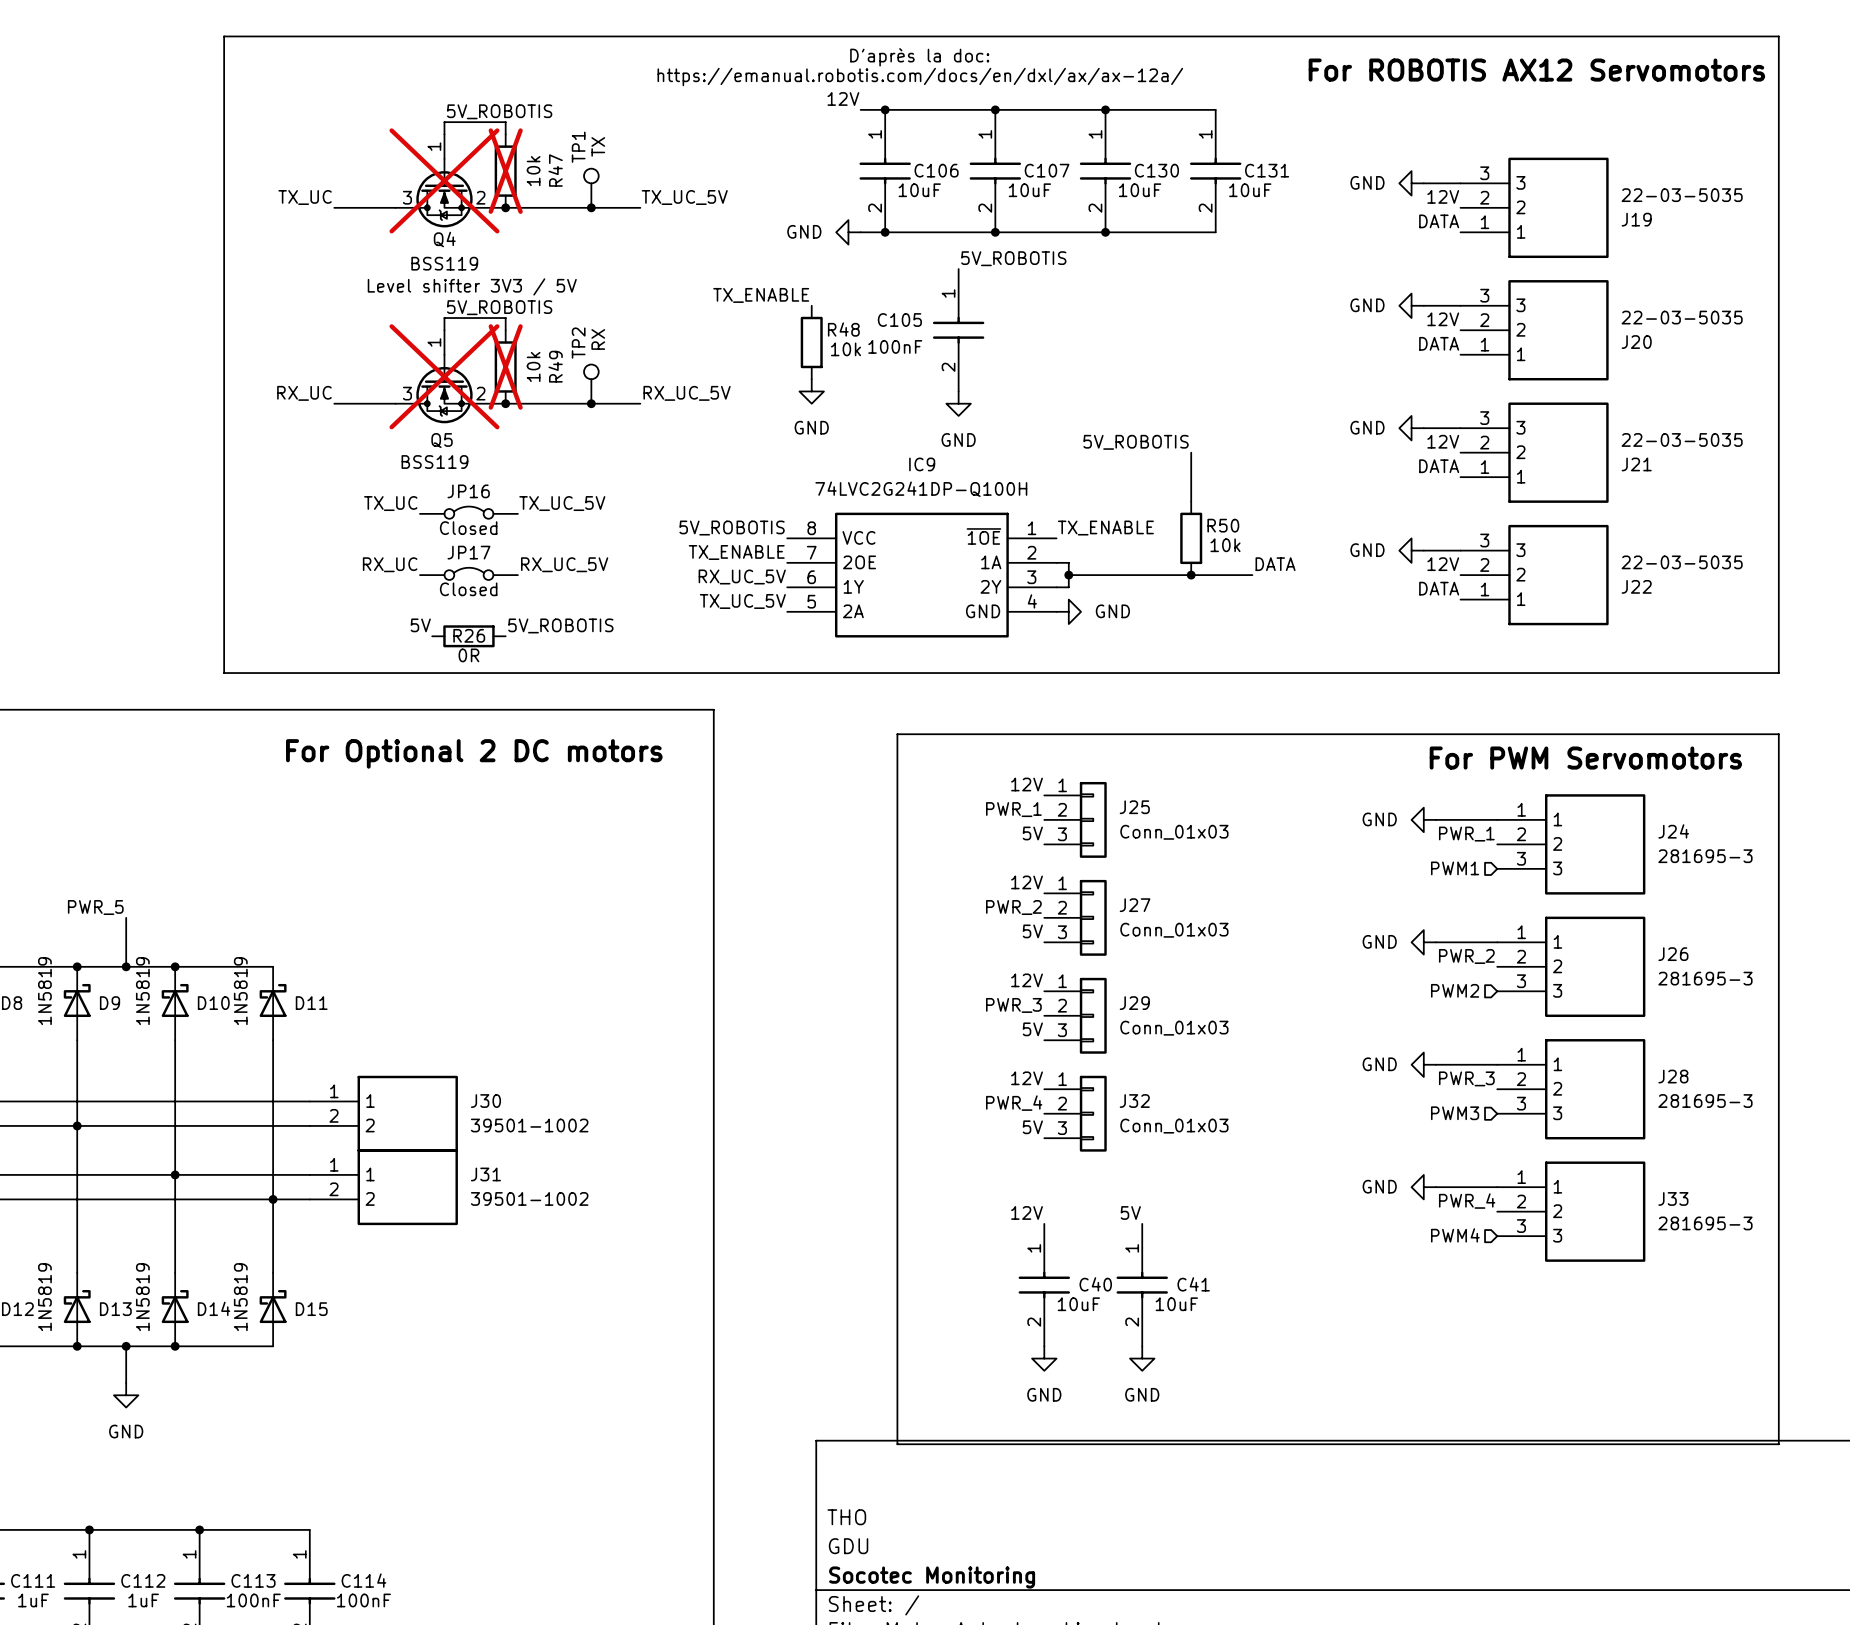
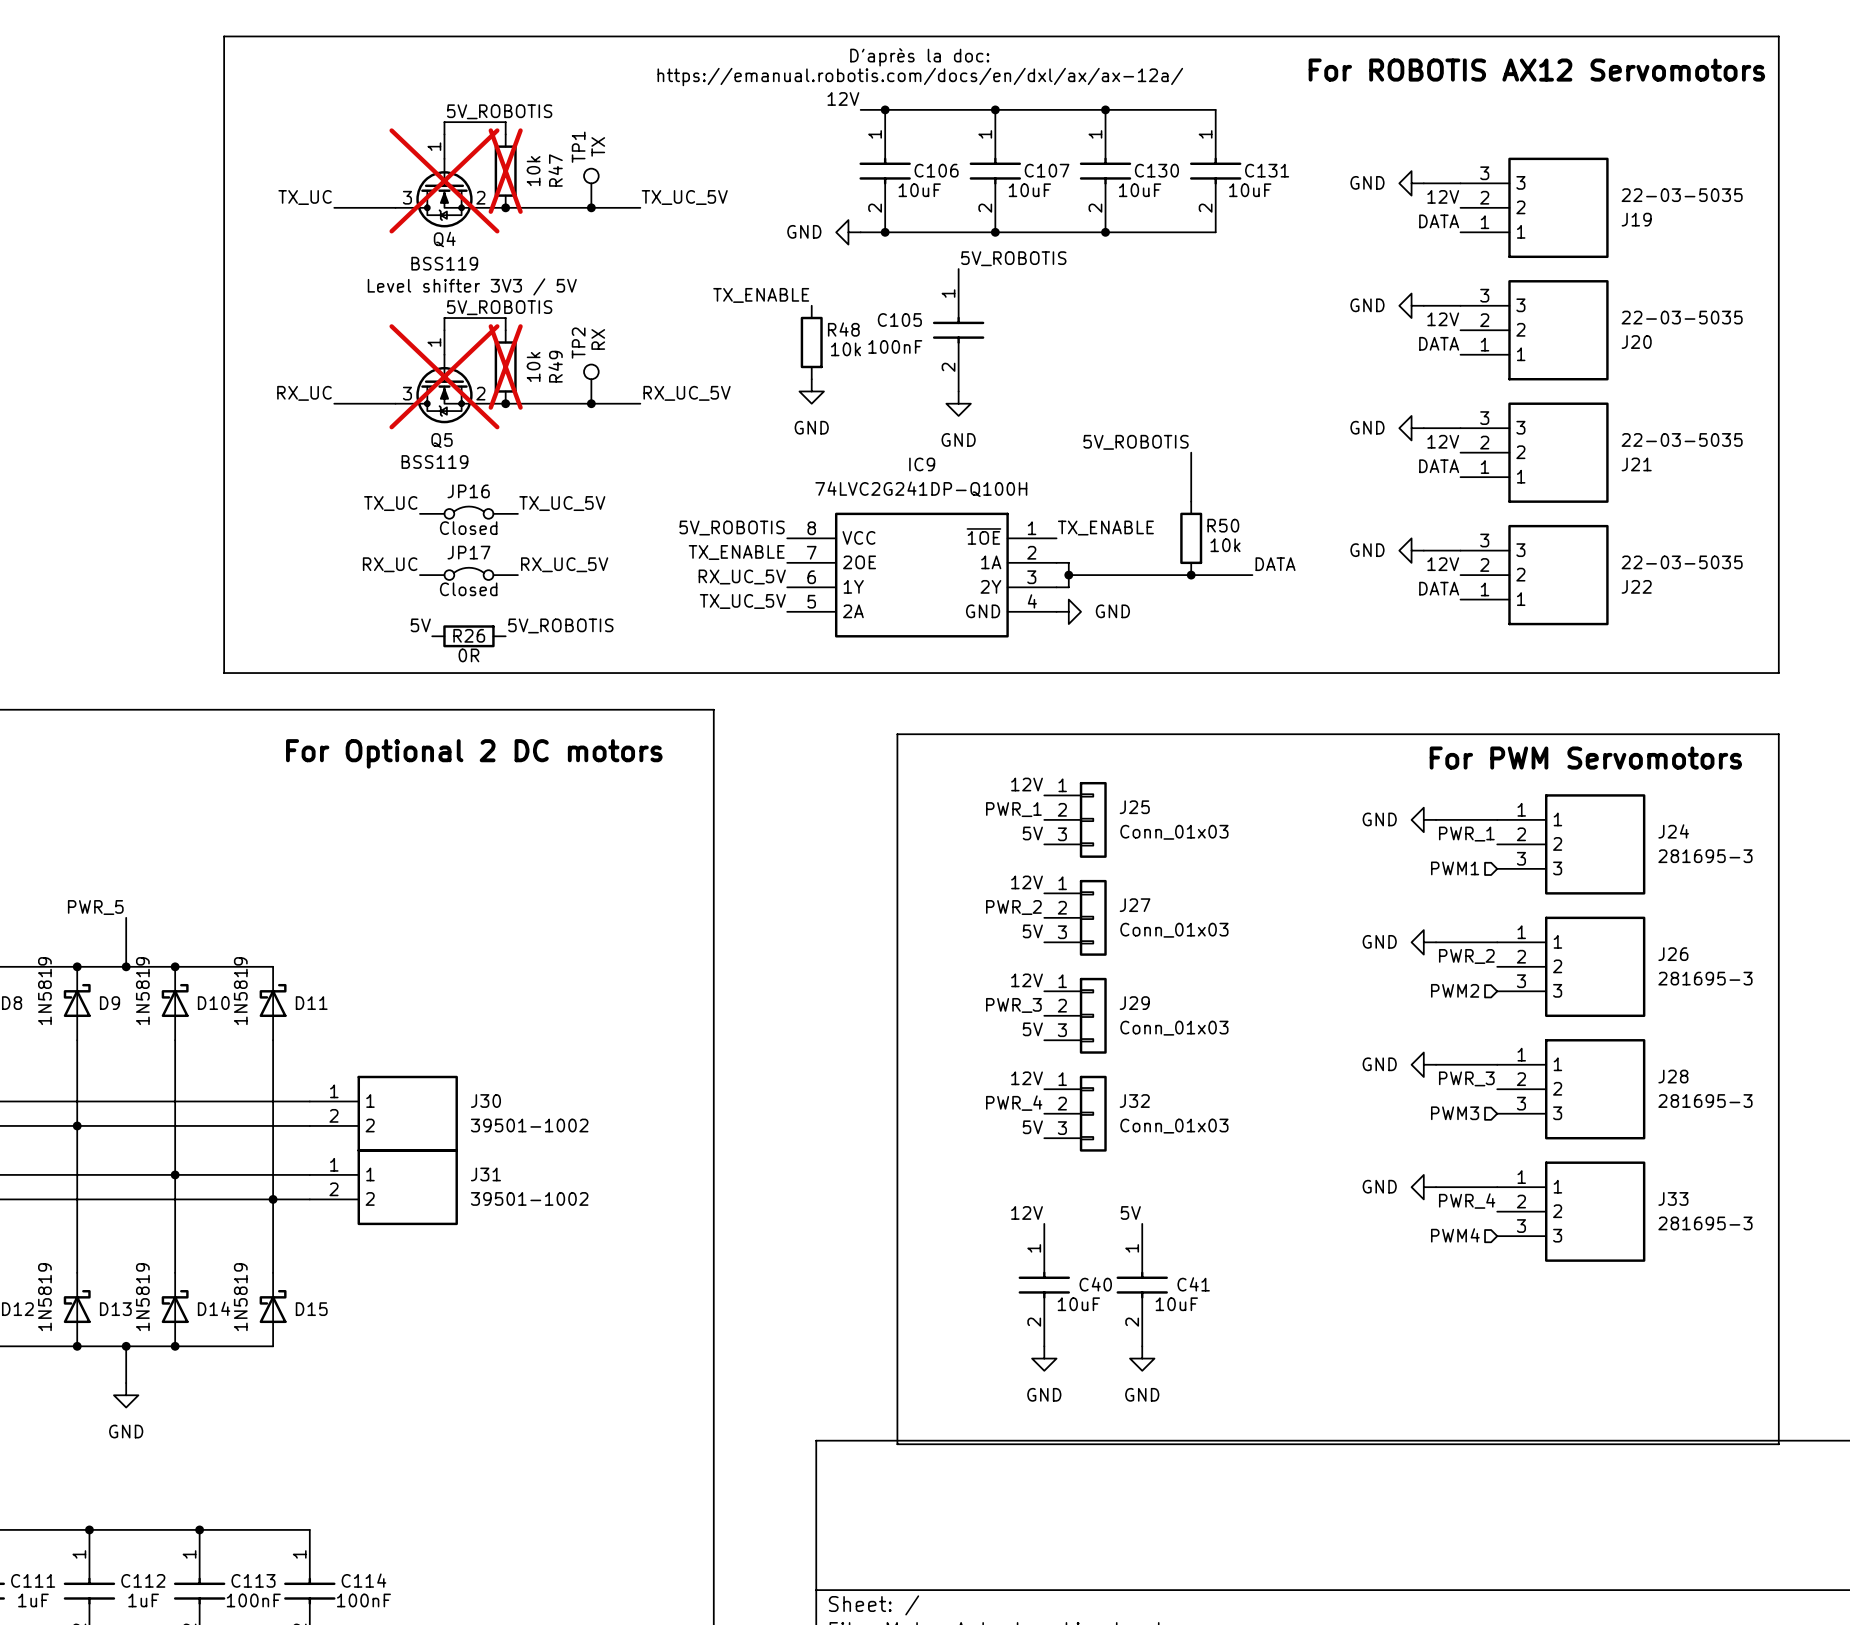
title block: THO (846, 1517) -> none
title block: GDU (848, 1546) -> none
title block: Socotec Monitoring (932, 1577) -> none

